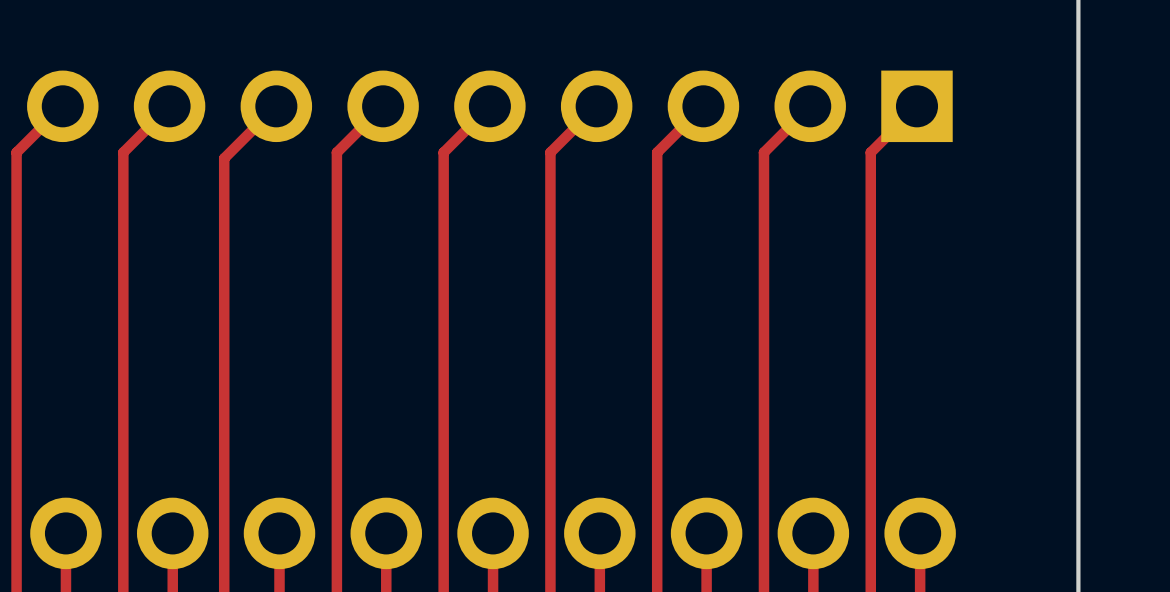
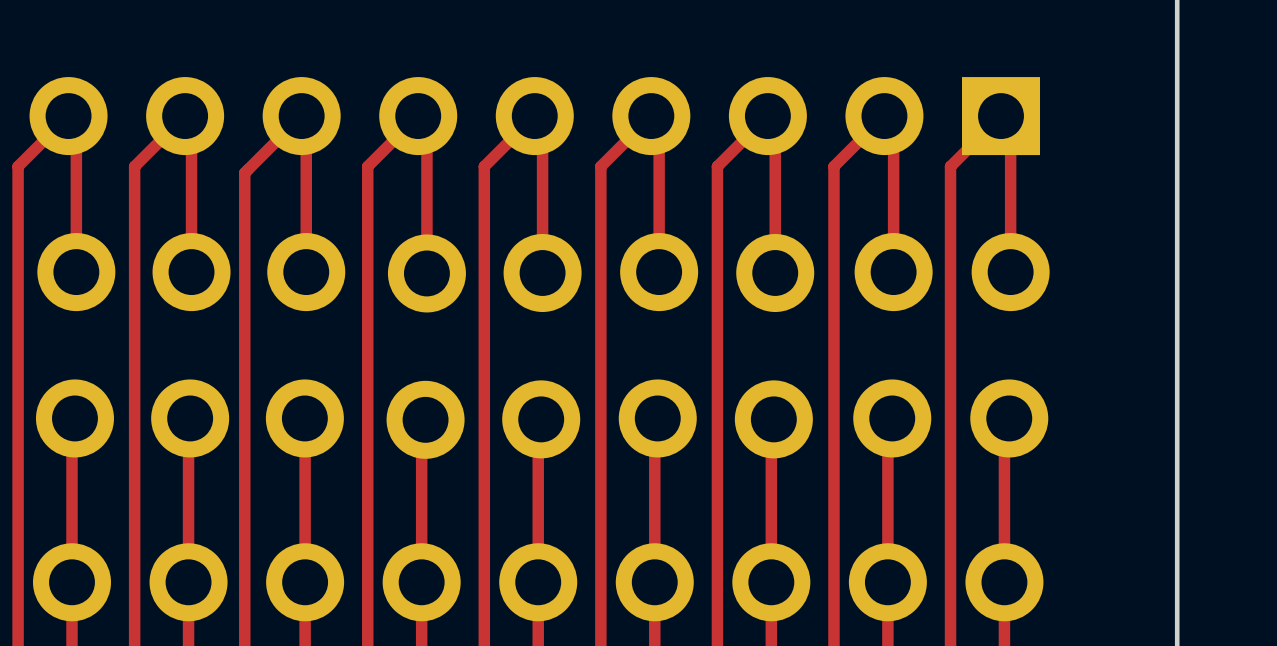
track: none -> (68, 116) (76, 123) (76, 272)
track: none -> (185, 116) (191, 122) (191, 272)
track: none -> (301, 116) (306, 120) (306, 272)
track: none -> (418, 116) (426, 124) (426, 273)
track: none -> (534, 116) (542, 123) (542, 273)
track: none -> (651, 116) (659, 123) (659, 272)
track: none -> (767, 116) (775, 123) (775, 273)
track: none -> (884, 116) (893, 125) (893, 272)
track: none -> (1001, 116) (1010, 125) (1010, 272)
part: none -> (76, 272)
part: none -> (191, 272)
part: none -> (306, 272)
part: none -> (659, 272)
part: none -> (893, 272)
part: none -> (1010, 272)
part: none -> (426, 273)
part: none -> (542, 273)
part: none -> (775, 273)
track: none -> (74, 418) (71, 421) (71, 582)
part: none -> (74, 418)
track: none -> (190, 418) (188, 420) (188, 582)
part: none -> (190, 418)
track: none -> (305, 418) (305, 582)
part: none -> (304, 418)
track: none -> (657, 418) (654, 421) (654, 582)
part: none -> (657, 418)
track: none -> (892, 418) (887, 422) (887, 582)
part: none -> (892, 418)
track: none -> (1009, 418) (1004, 423) (1004, 582)
part: none -> (1009, 418)
track: none -> (425, 419) (421, 423) (421, 582)
part: none -> (425, 419)
track: none -> (541, 419) (538, 422) (538, 582)
part: none -> (541, 419)
track: none -> (773, 419) (771, 421) (771, 582)
part: none -> (773, 419)

